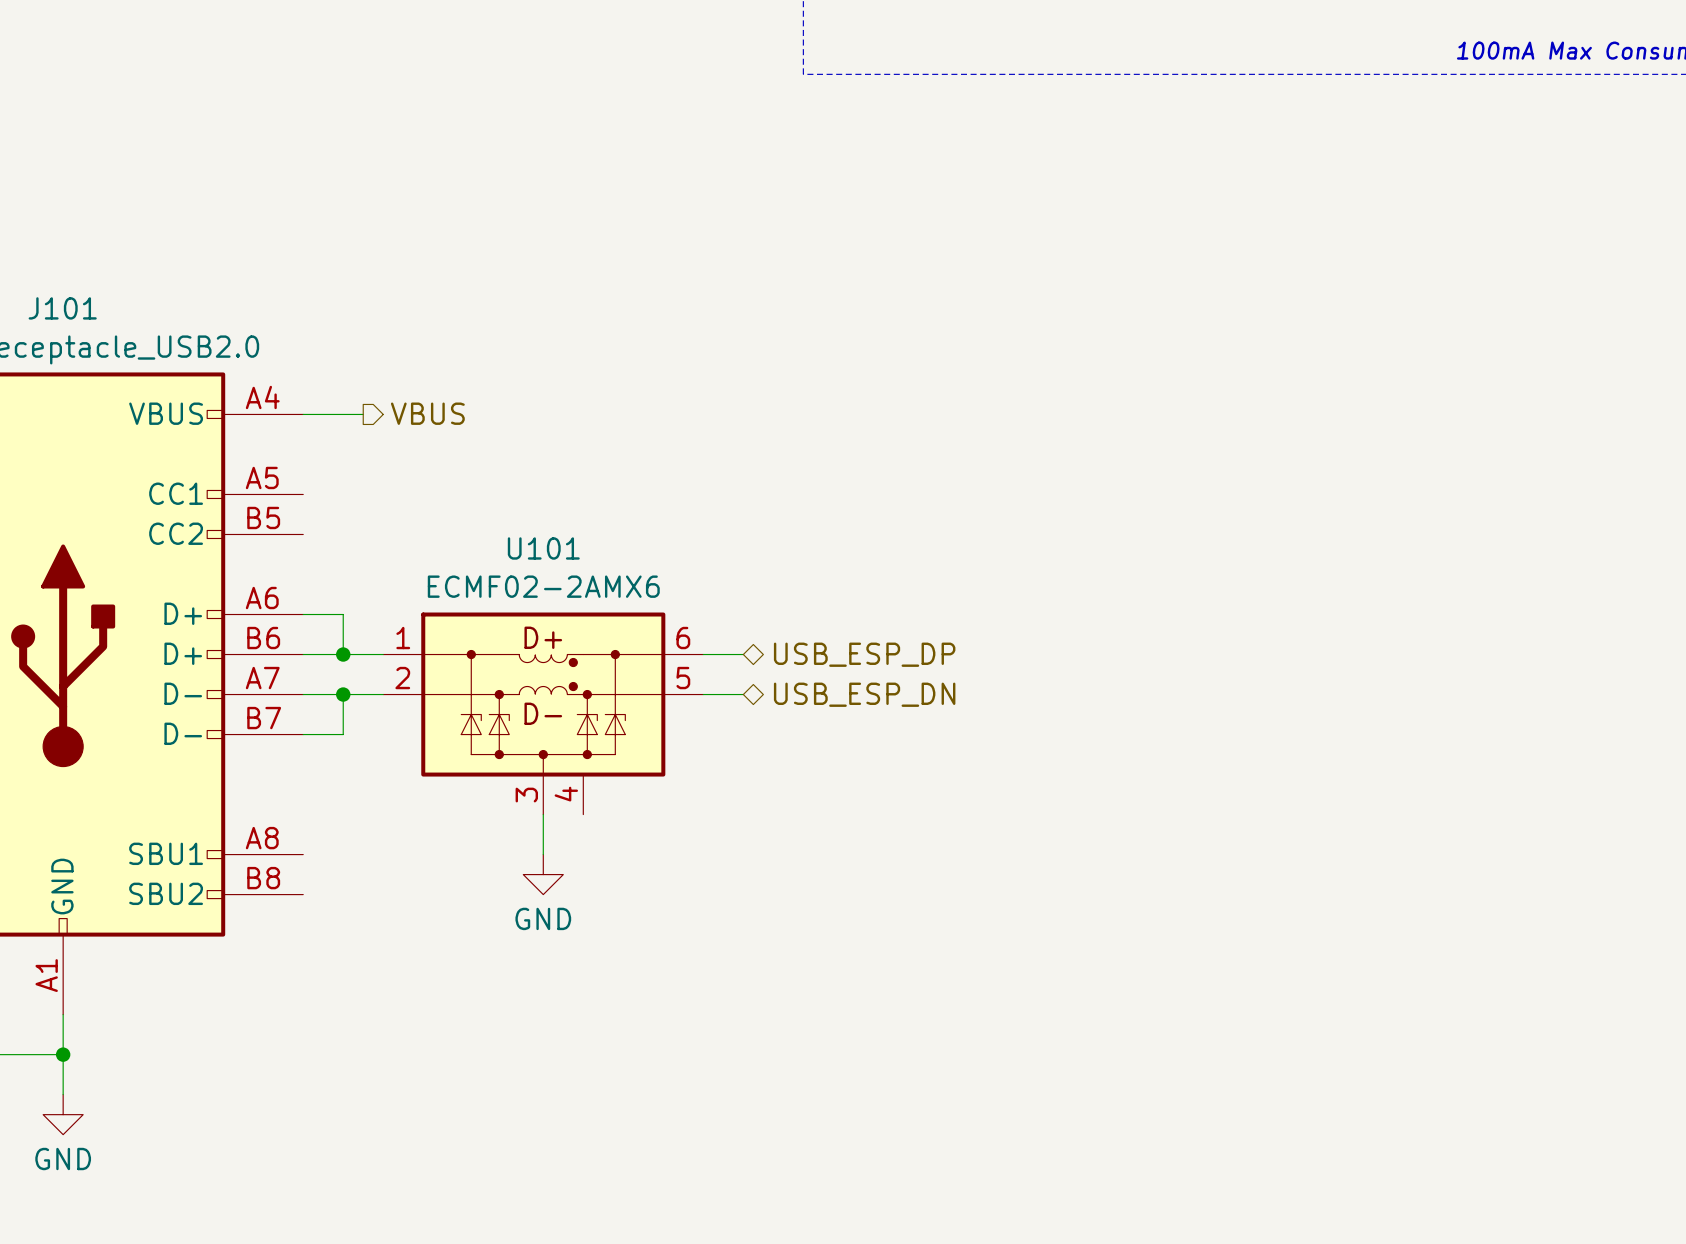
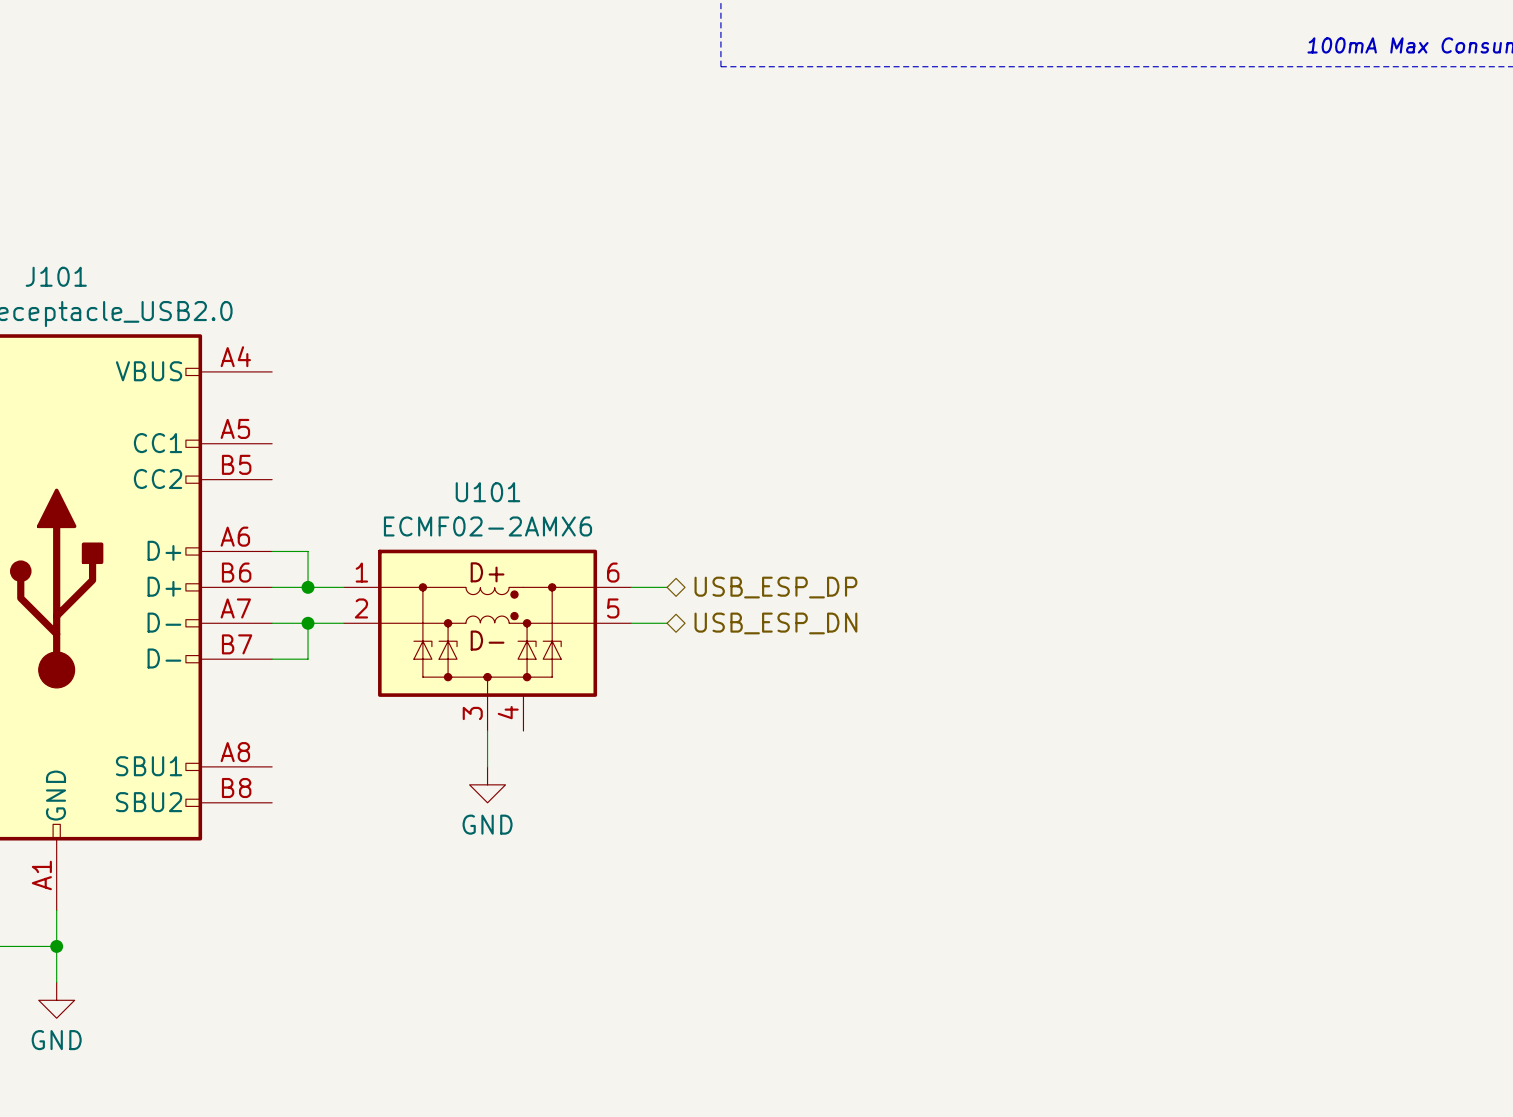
hierarchical label: VBUS (427, 413) -> none
wire: (303, 414) (363, 414) -> none

